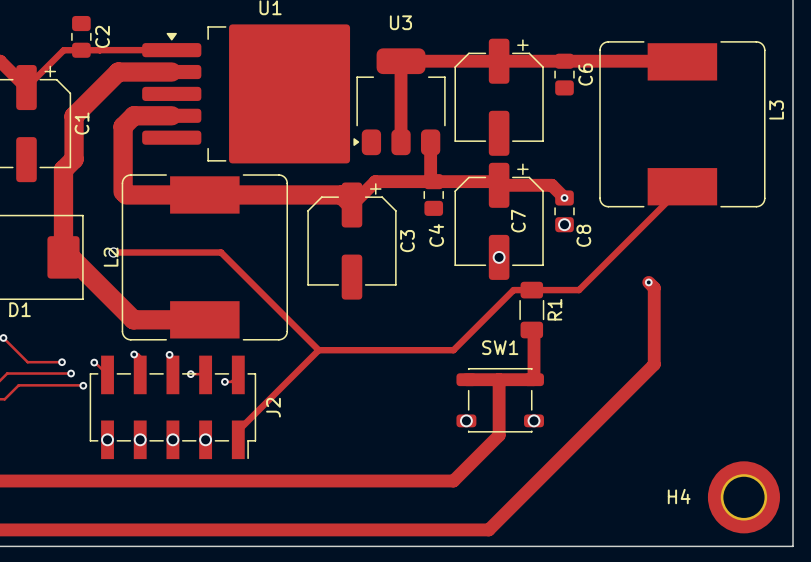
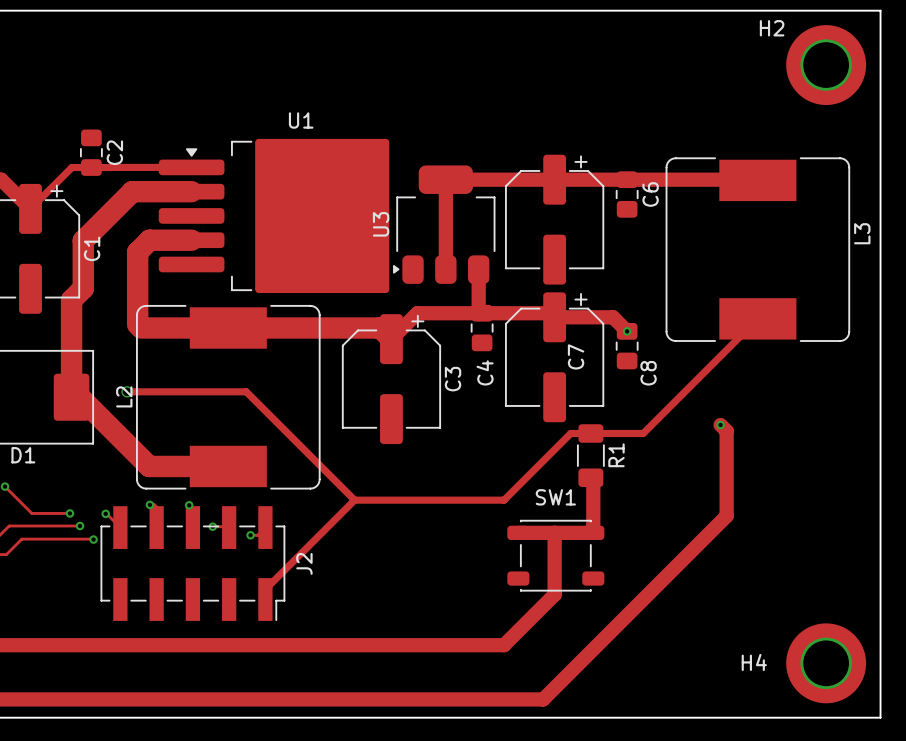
U3 name rotation: 0° (400, 22) -> 90° counterclockwise (381, 224)
U3 name position: U3 (400, 22) -> U3 (381, 224)
via: (564, 224) -> none
via: (499, 257) -> none
via: (466, 420) -> none
via: (534, 420) -> none
via: (107, 439) -> none
via: (140, 439) -> none
via: (172, 439) -> none
via: (205, 439) -> none

